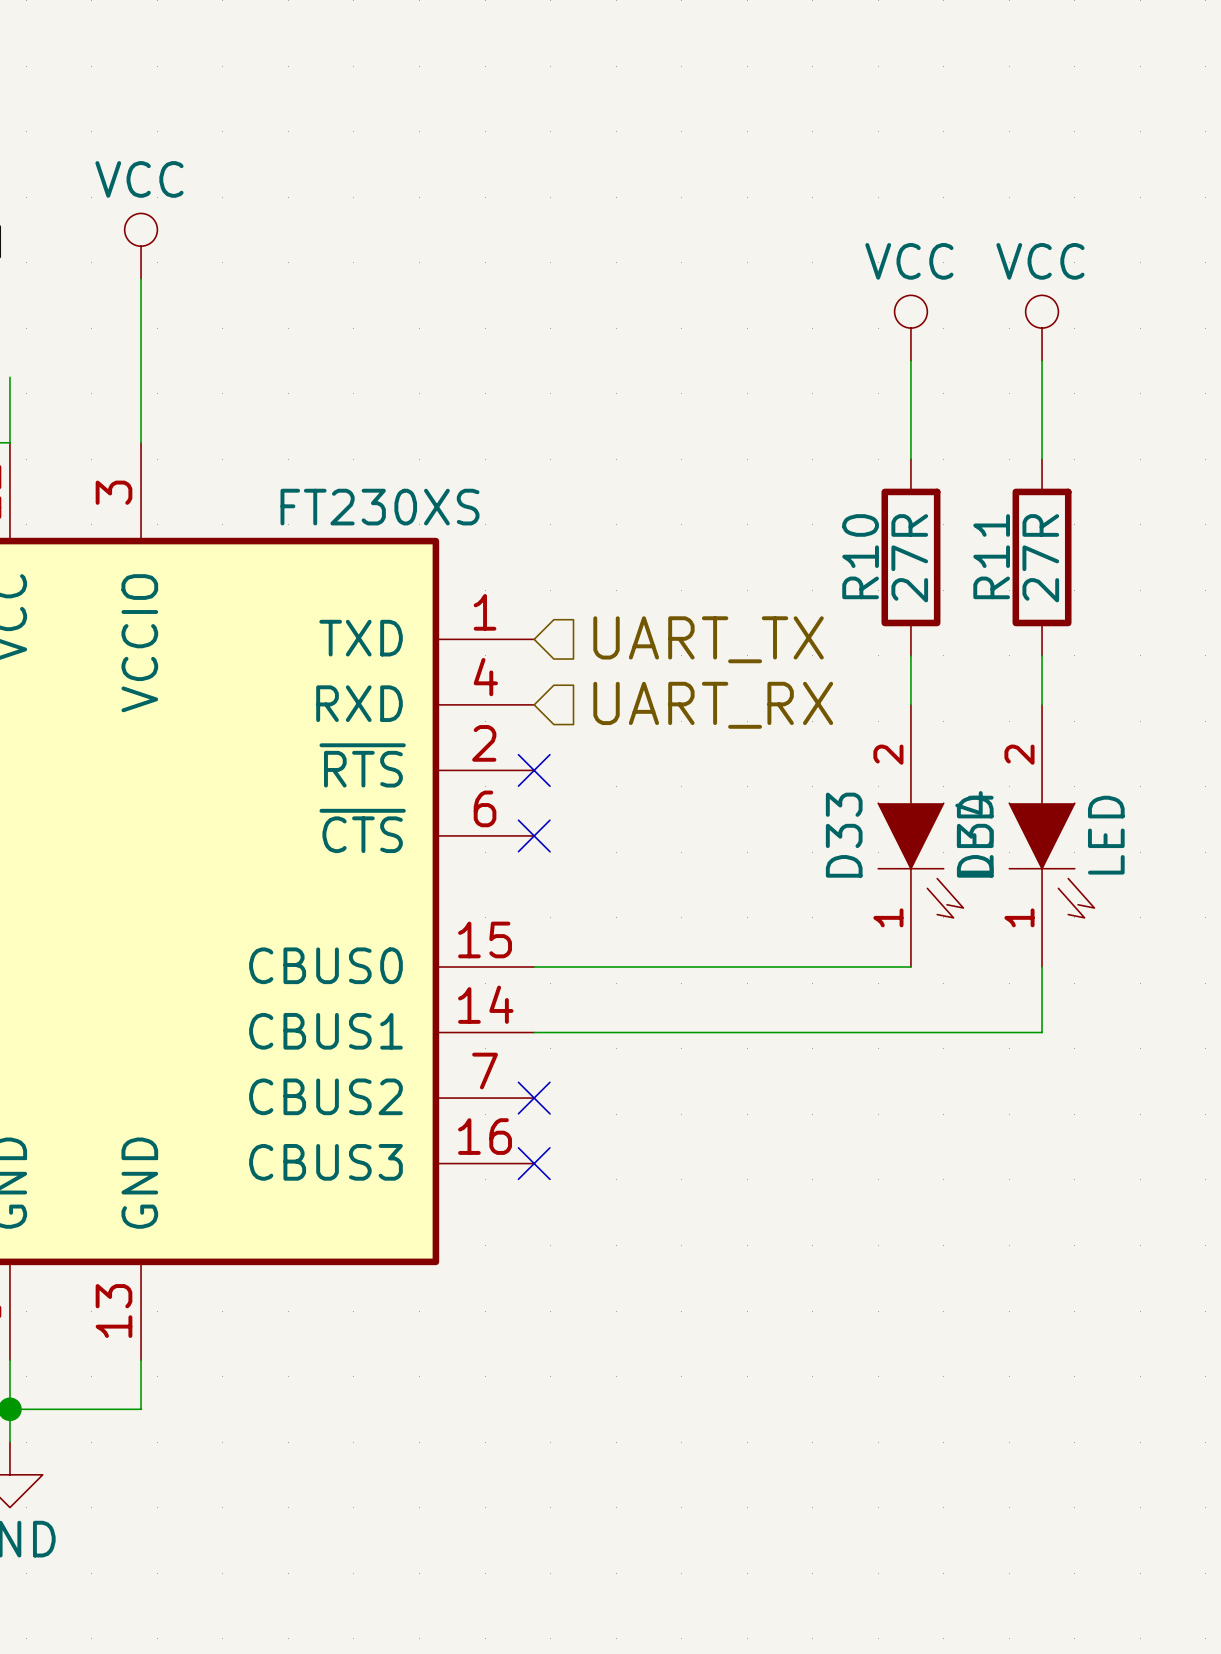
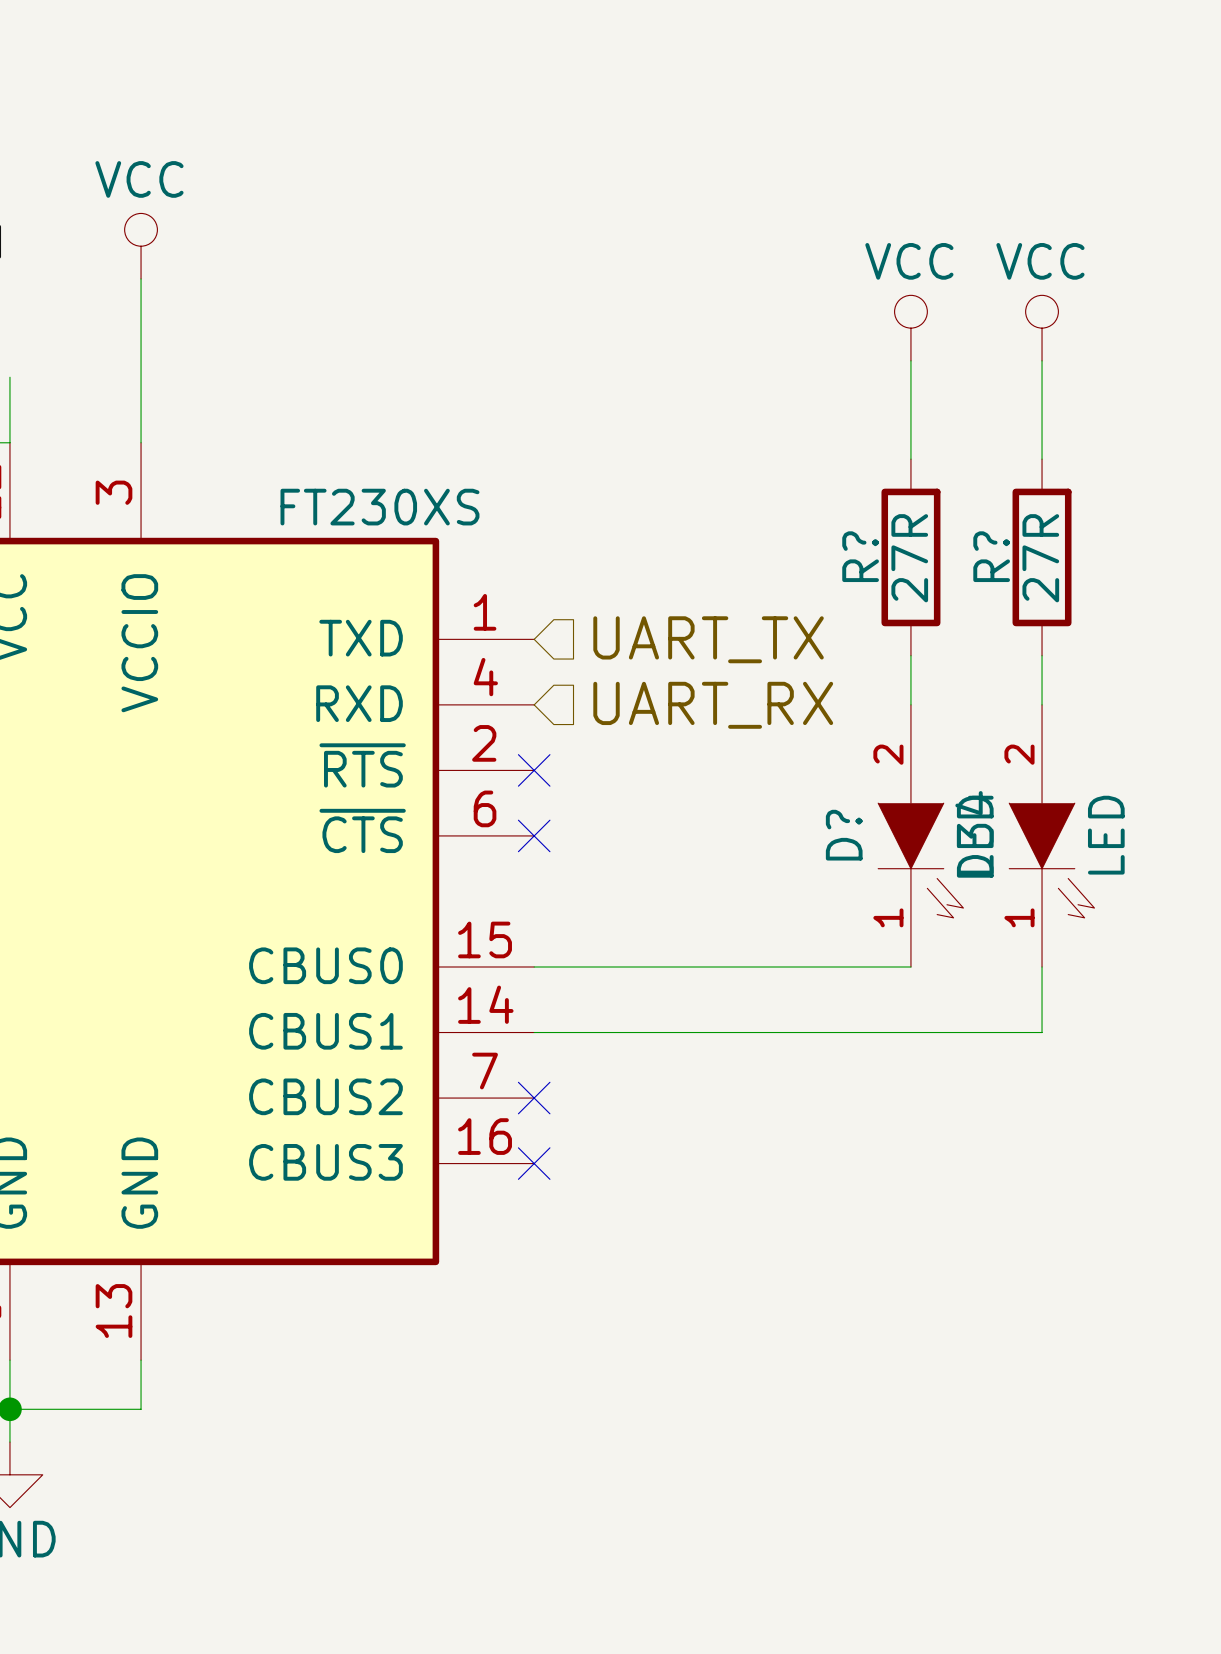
R10 name: R10 (860, 556) -> R? (860, 556)
R11 name: R11 (991, 556) -> R? (991, 556)
D33 name: D33 (844, 835) -> D? (844, 835)

